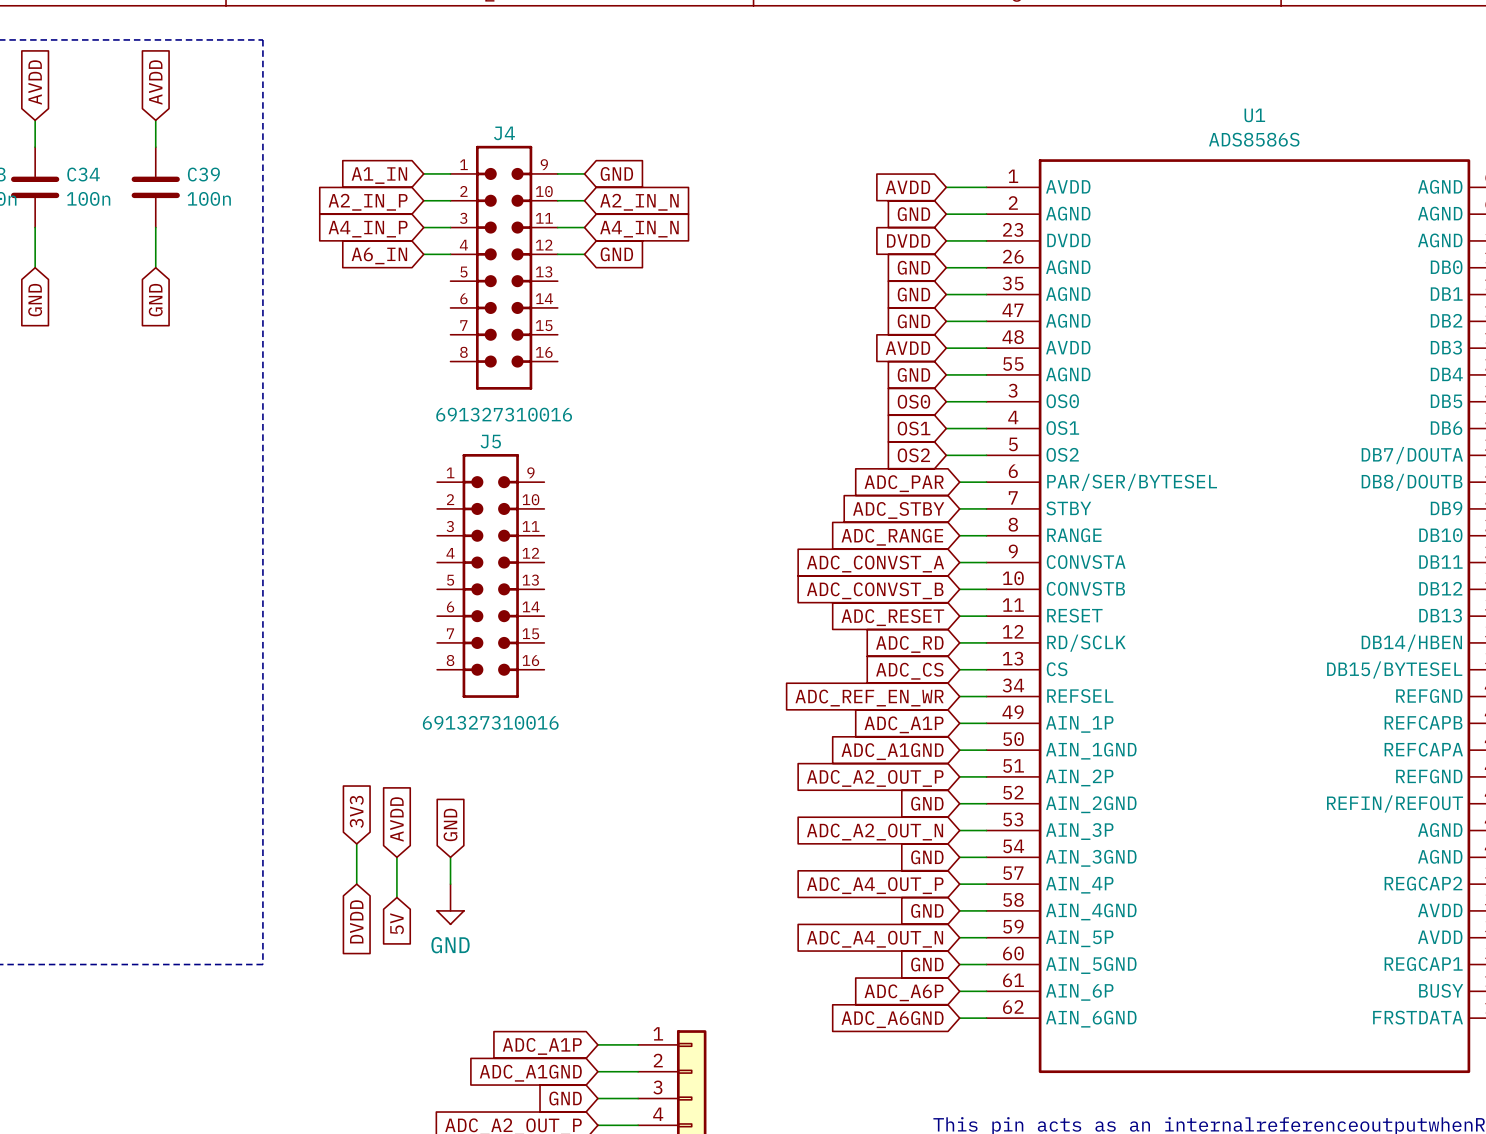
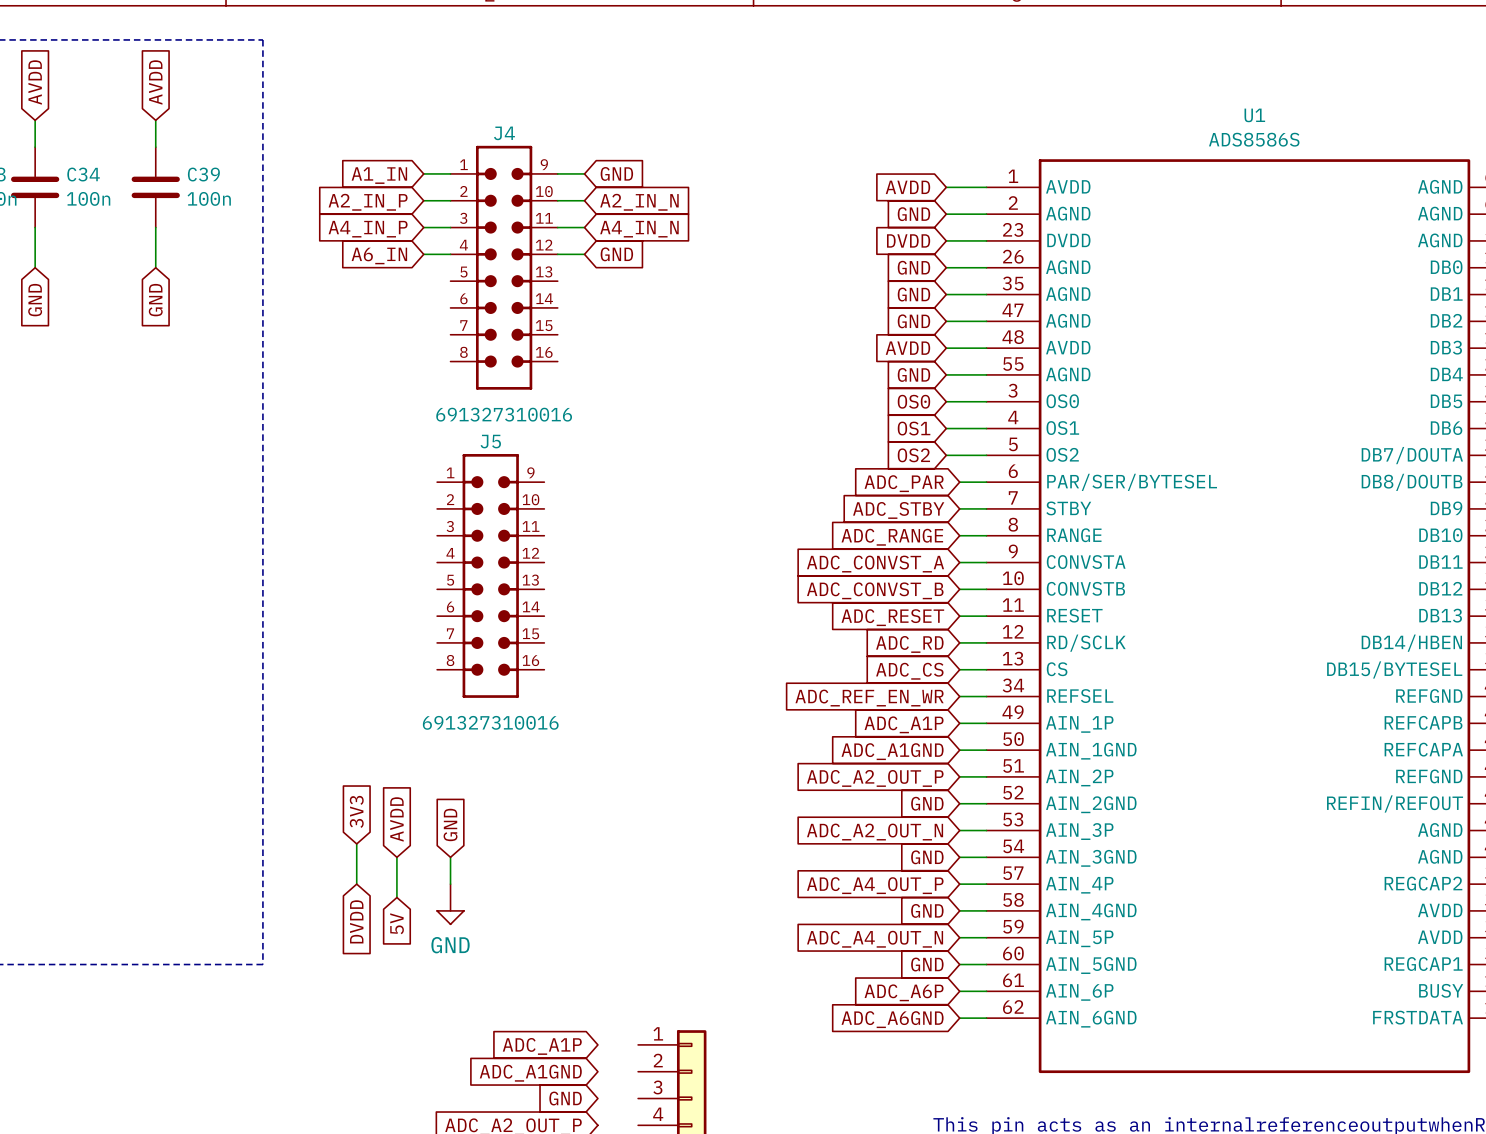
wire: (597, 1044) (638, 1044) -> none
wire: (597, 1071) (638, 1071) -> none
wire: (597, 1098) (638, 1098) -> none
wire: (597, 1125) (638, 1125) -> none

